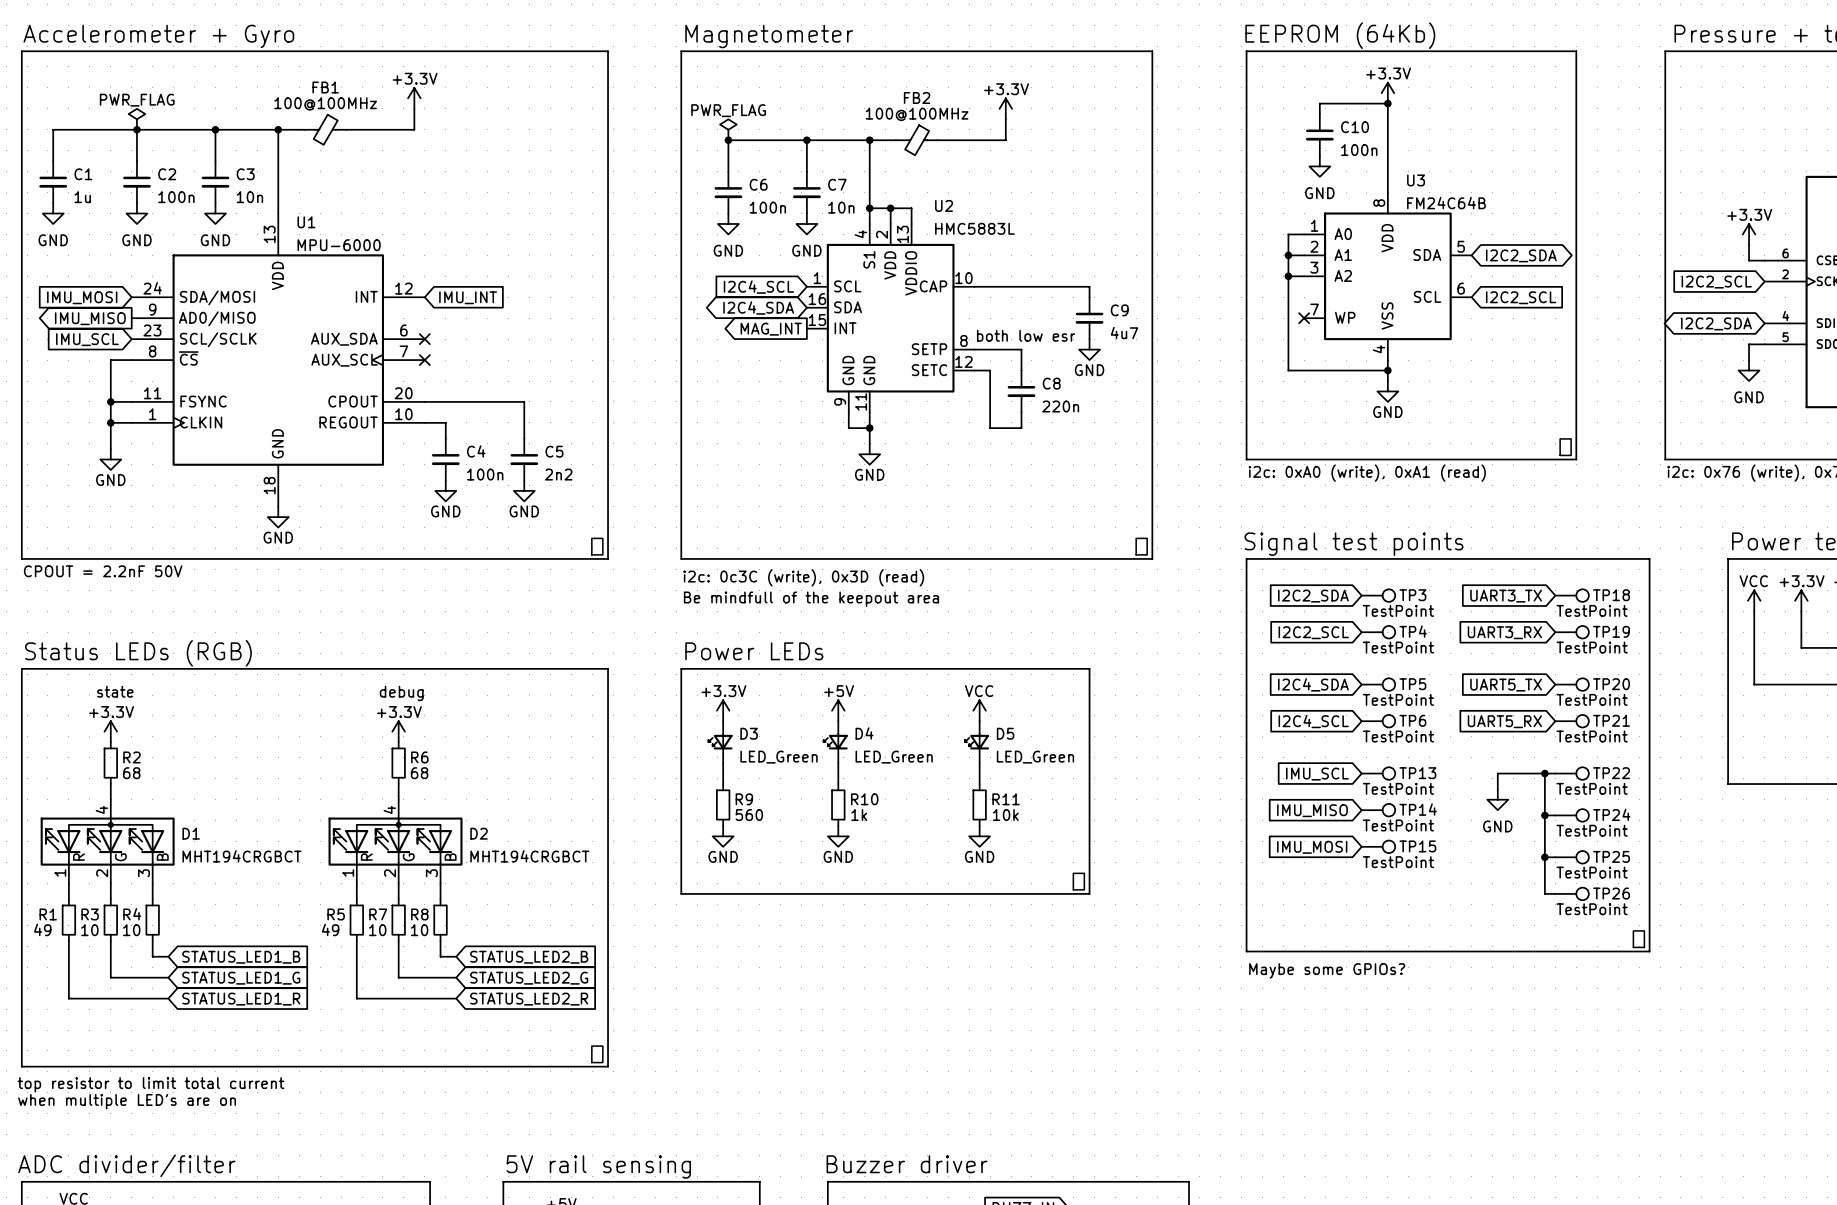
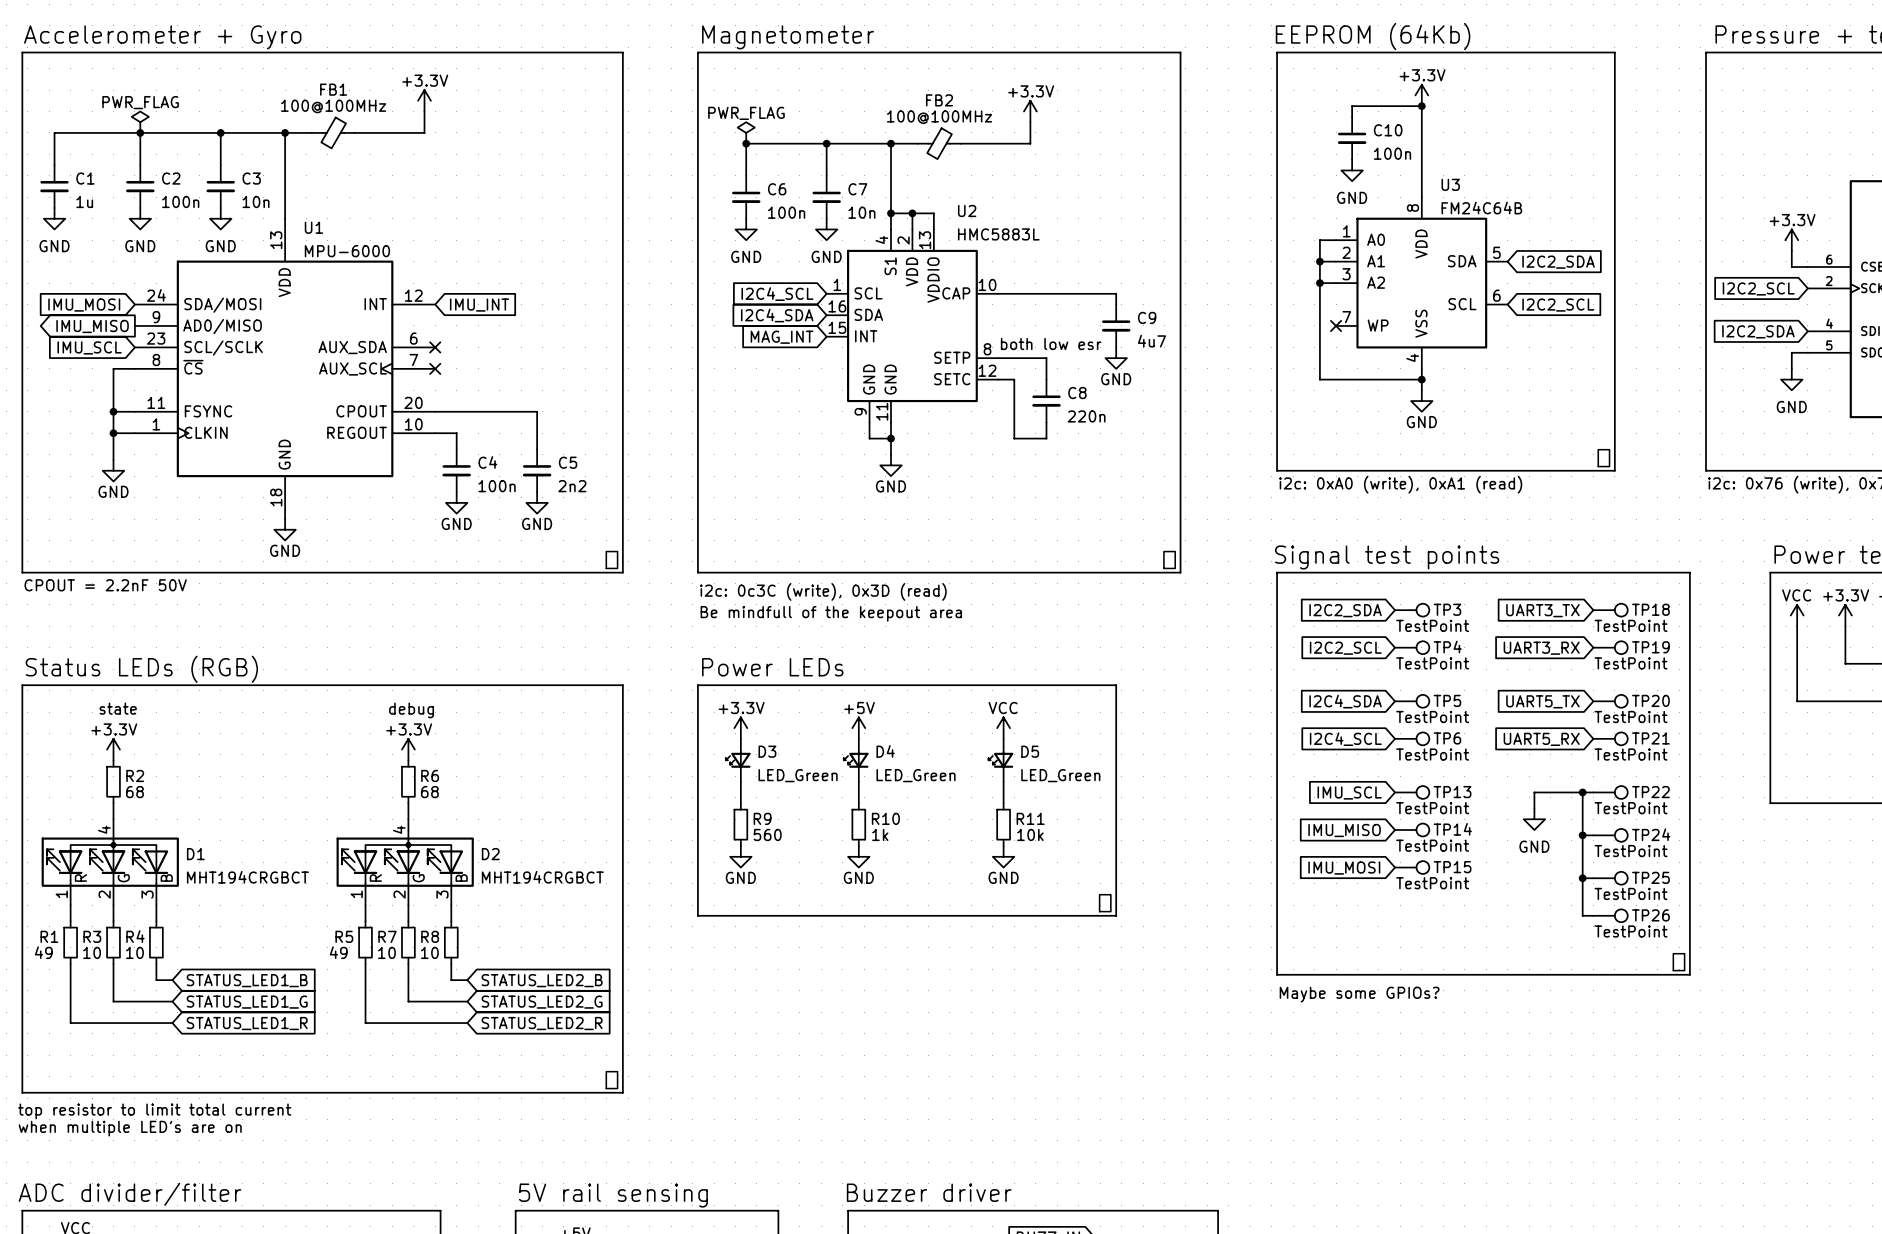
global label shape: bidirectional (1521, 255) -> input (1558, 262)
global label shape: bidirectional (758, 307) -> input (777, 315)
global label shape: bidirectional (1716, 323) -> input (1758, 331)
global label shape: output (771, 329) -> input (782, 337)

